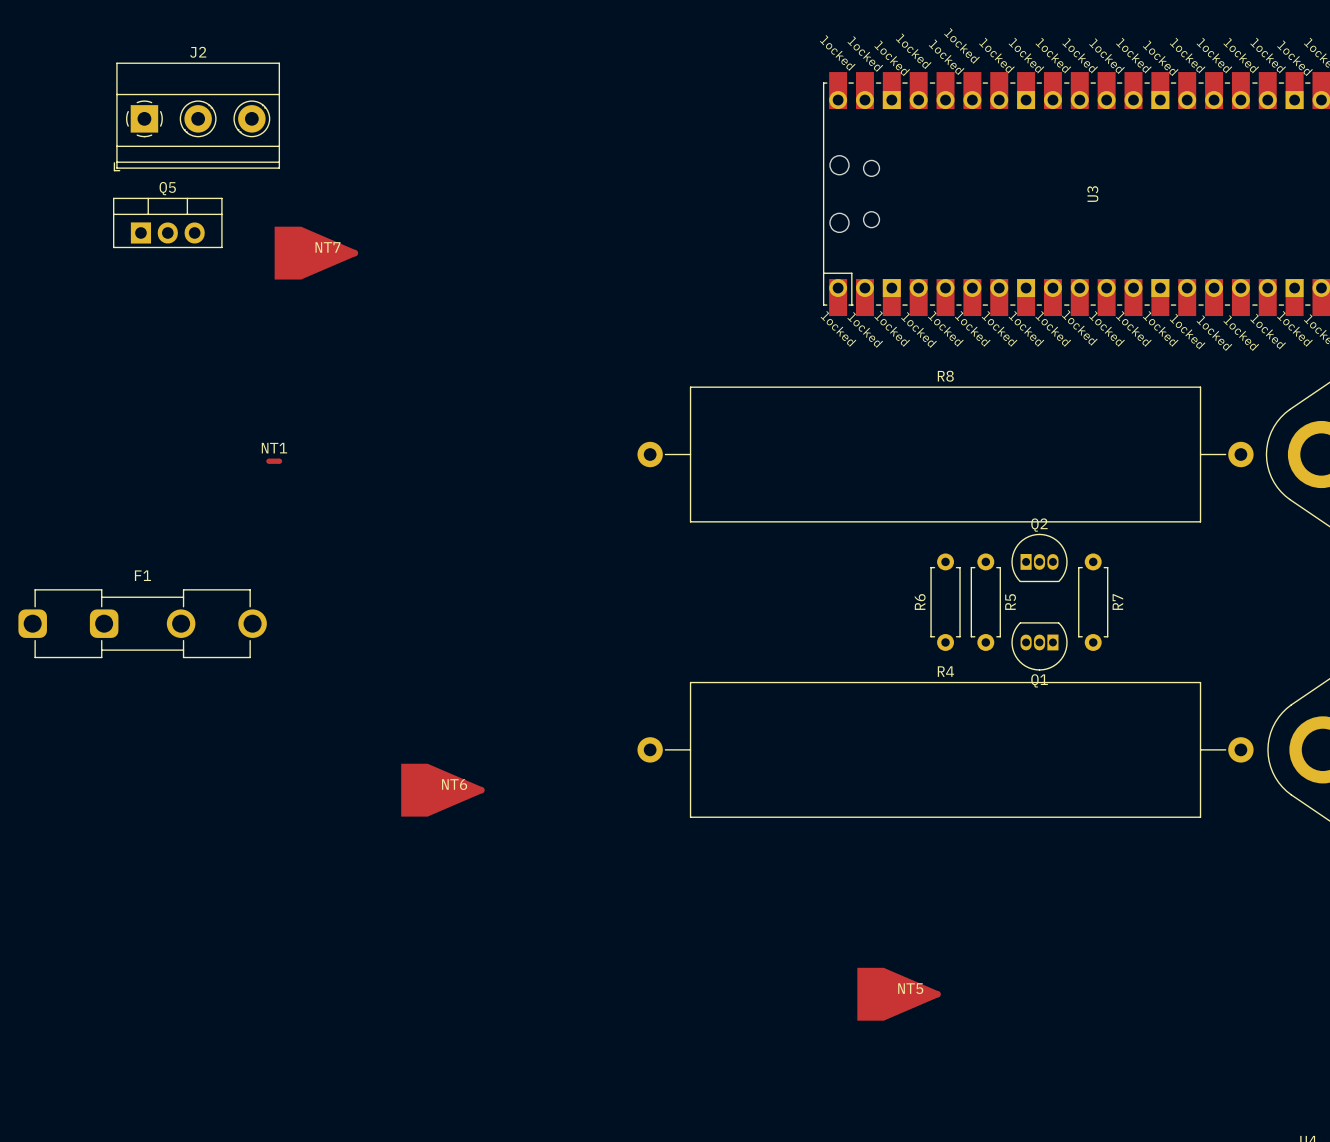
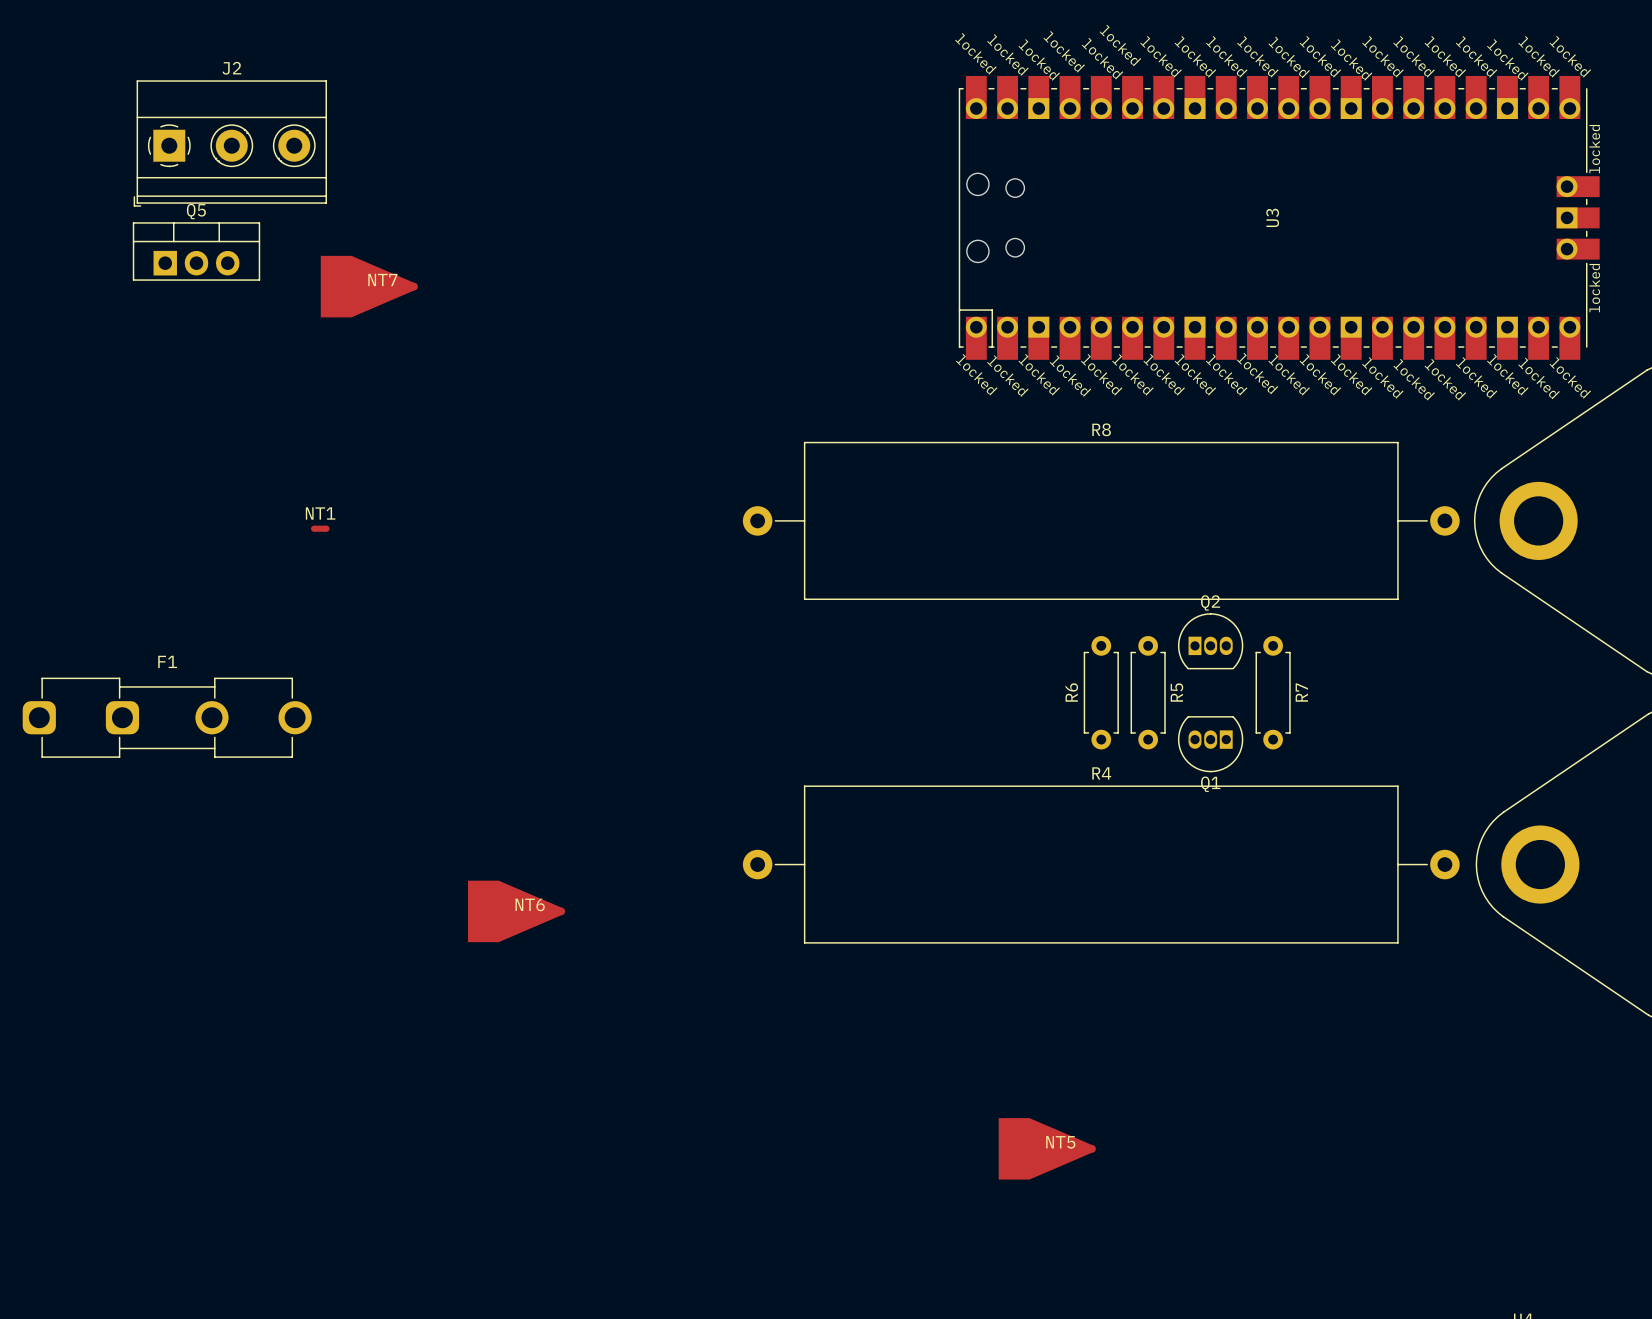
J2 position: (196, 116) -> (230, 143)

